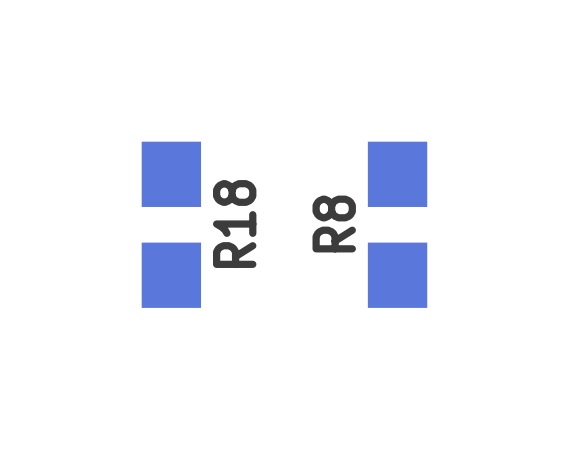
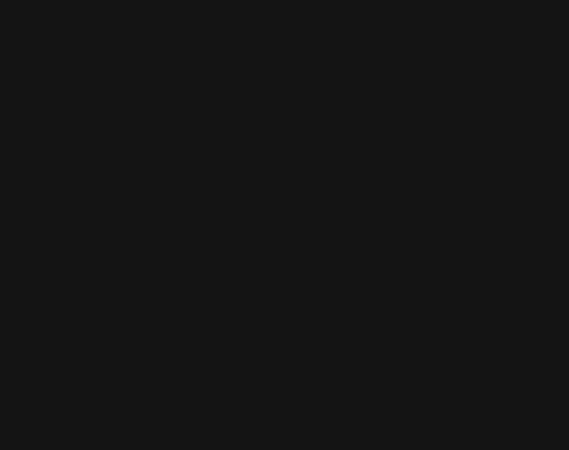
R18: (171, 224) -> none
R8: (397, 224) -> none

